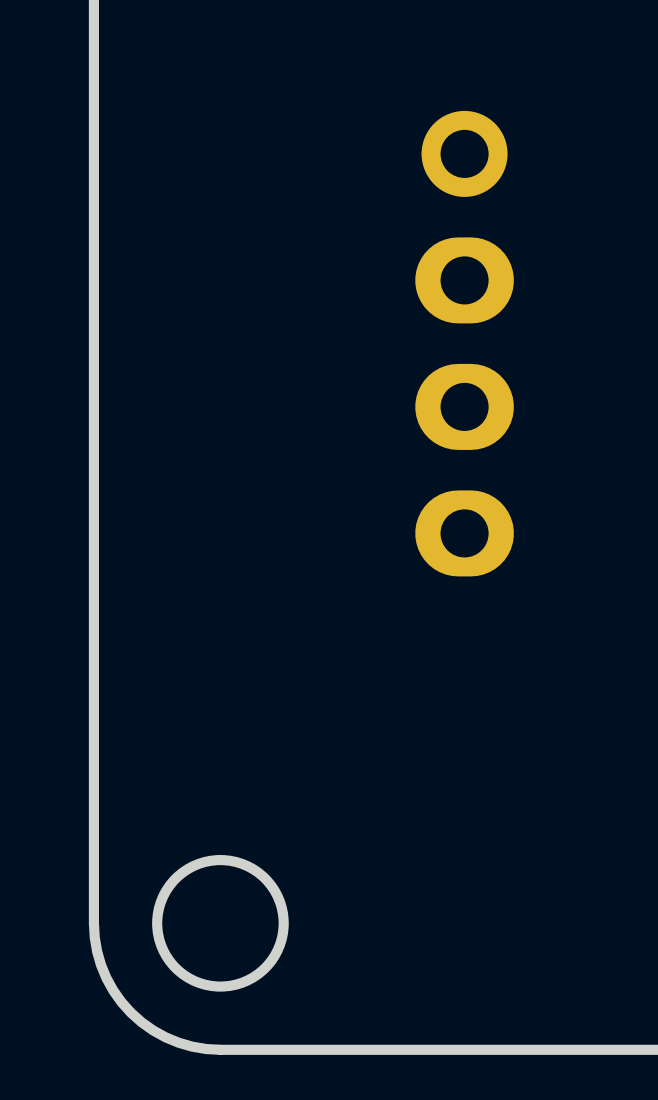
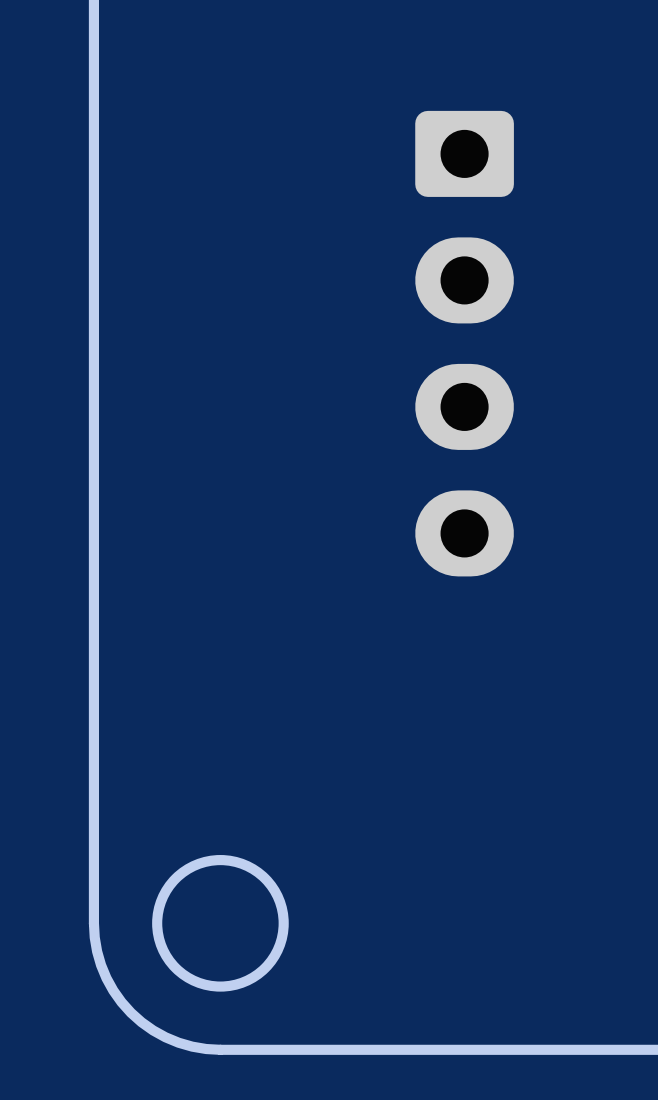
part footprint: [415, 110, 514, 577] -> [415, 110, 514, 577]

